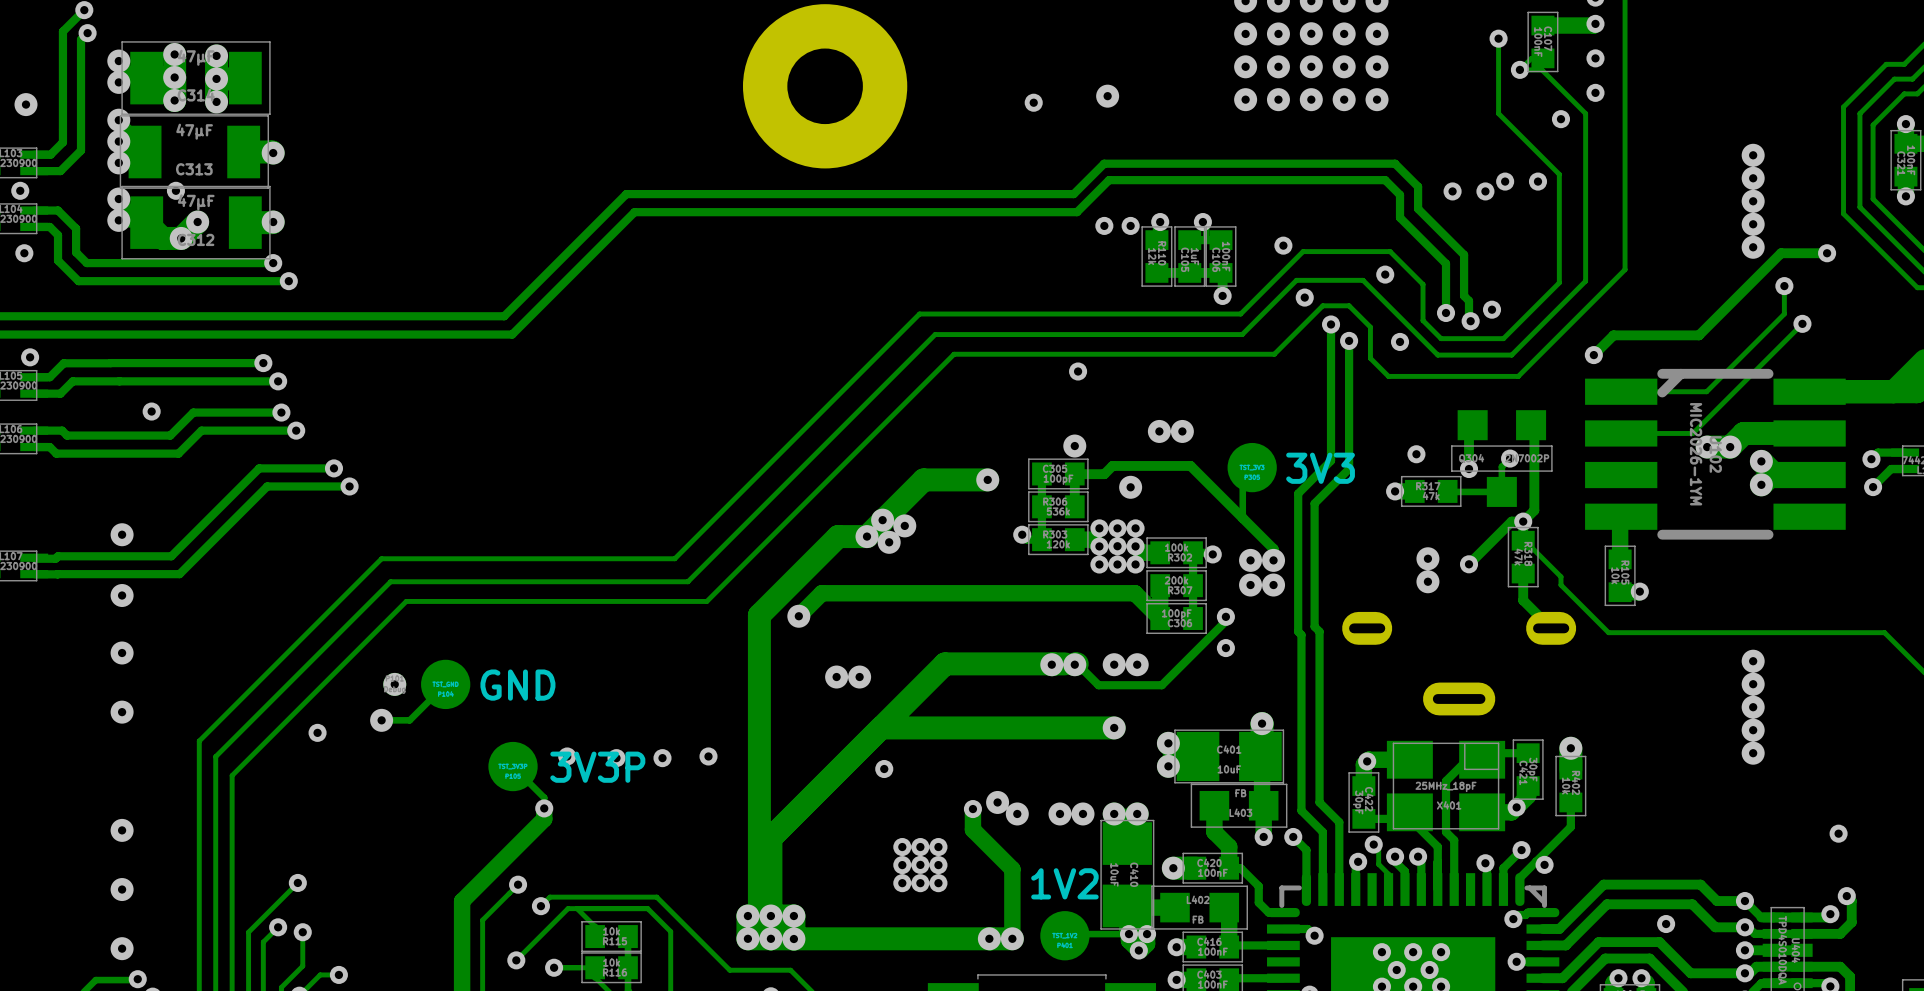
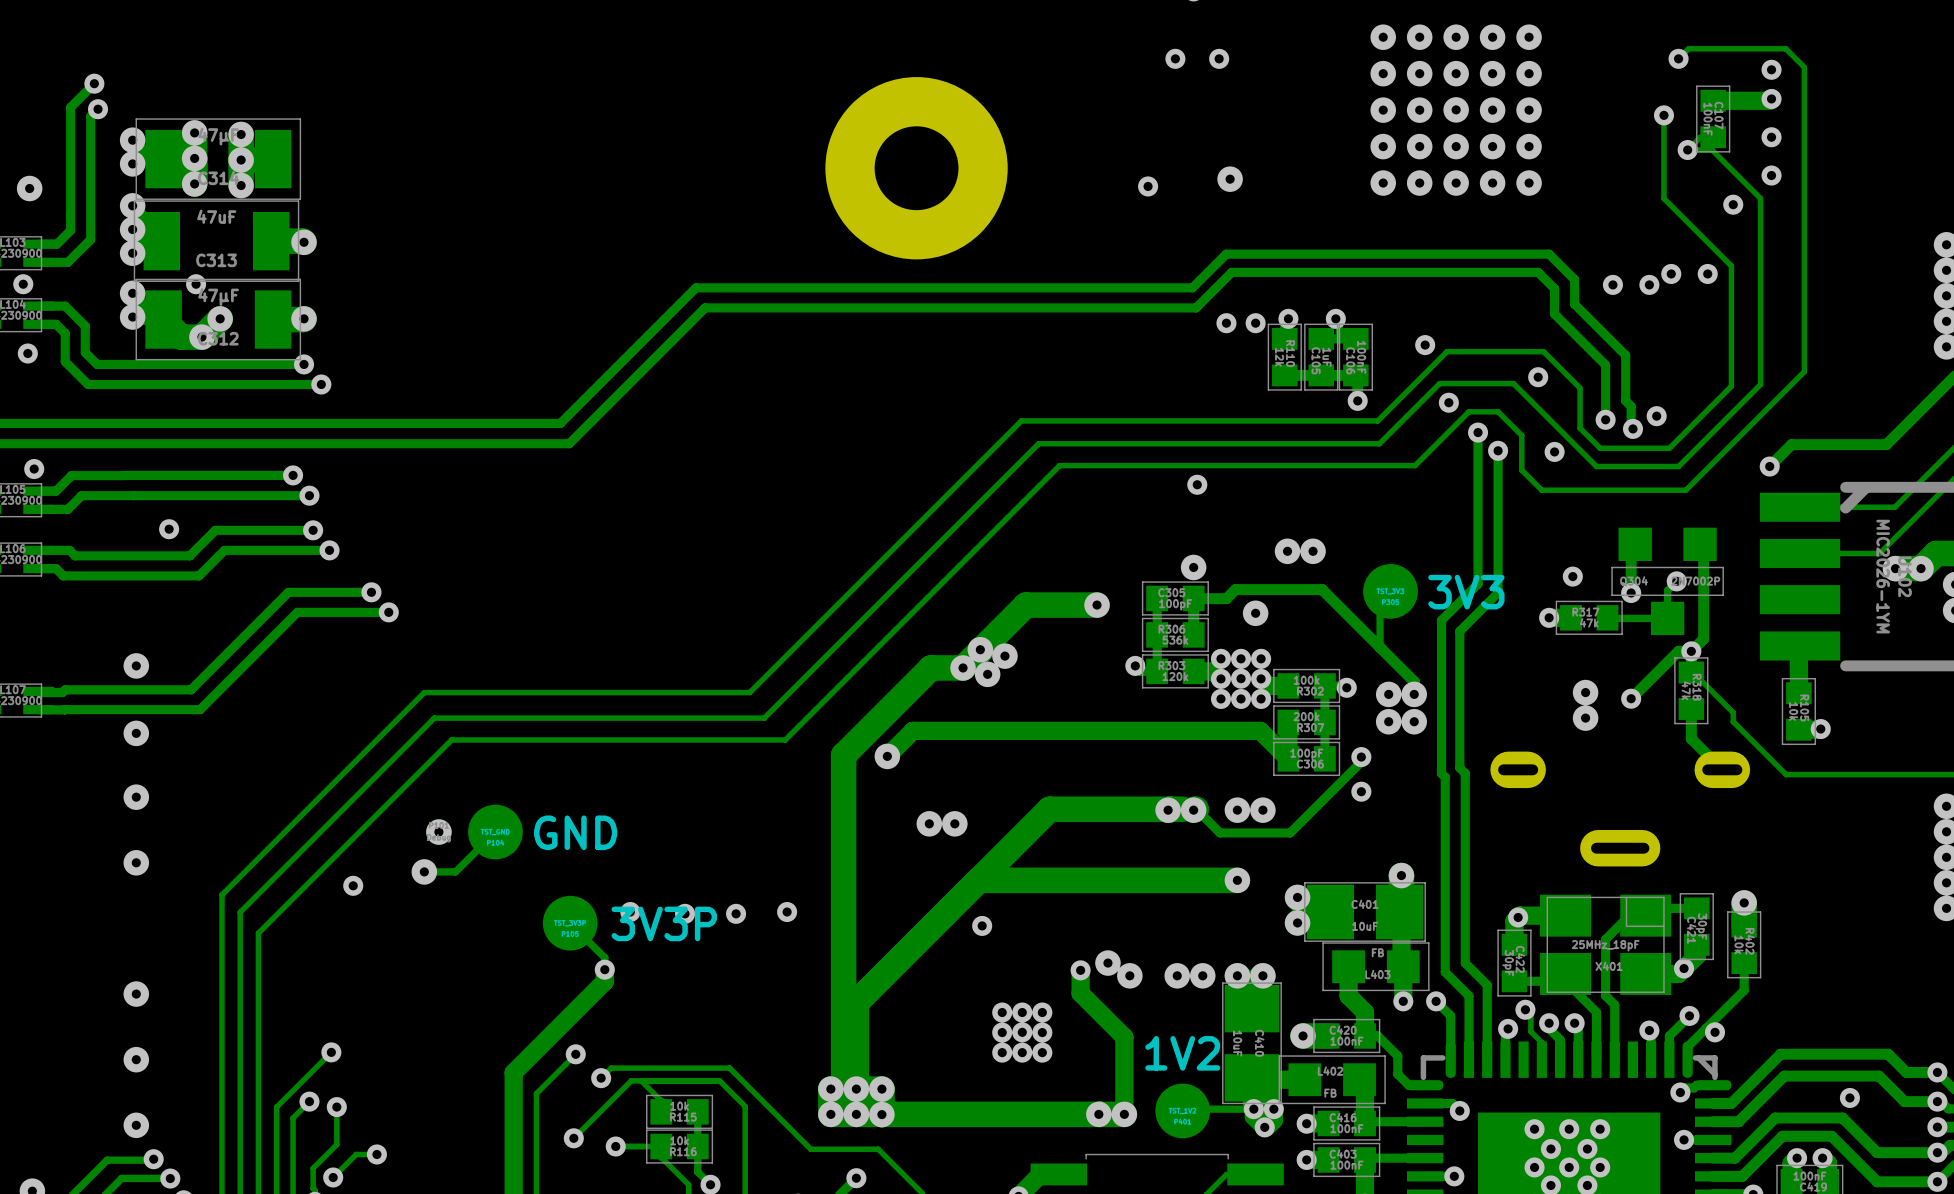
C313 value: 47µF (194, 131) -> 47uF (216, 216)

